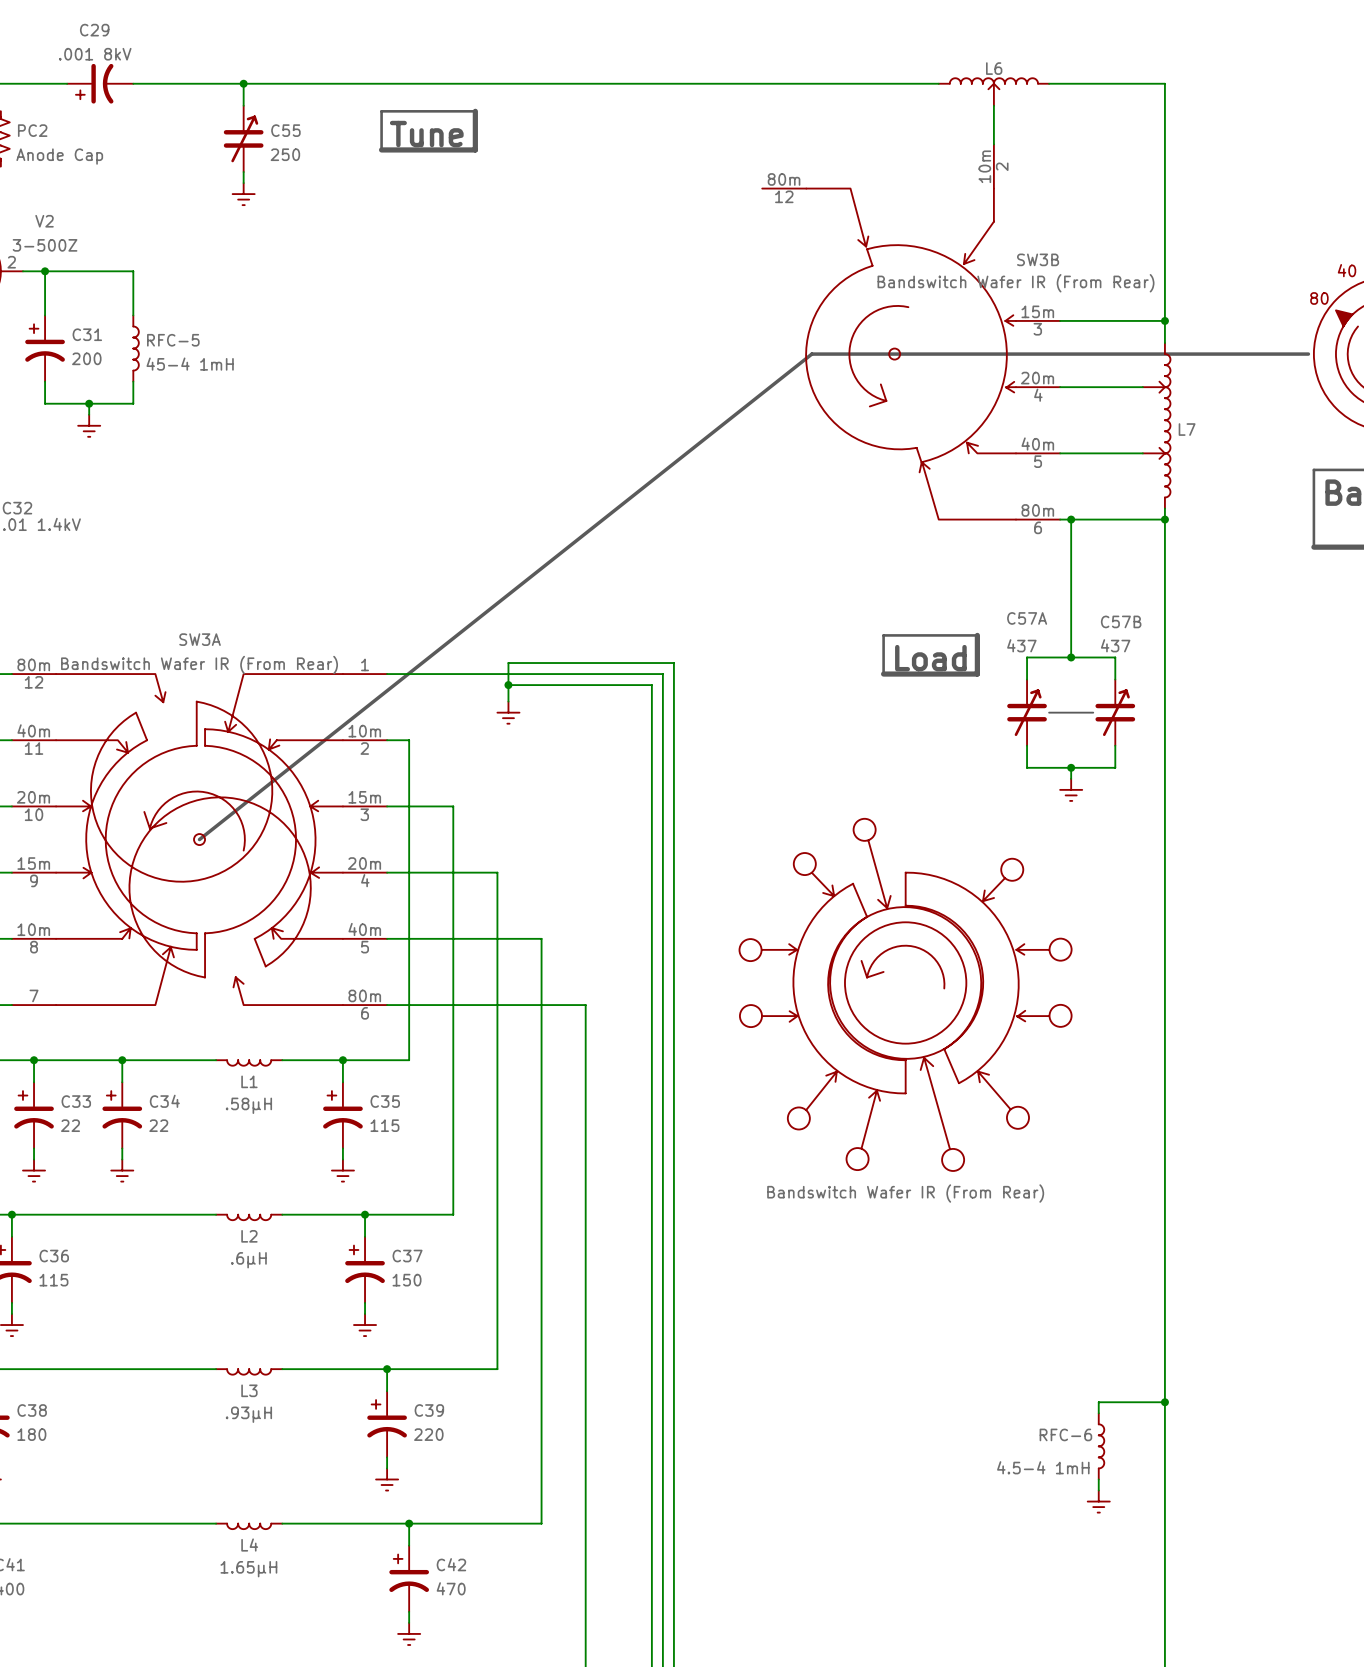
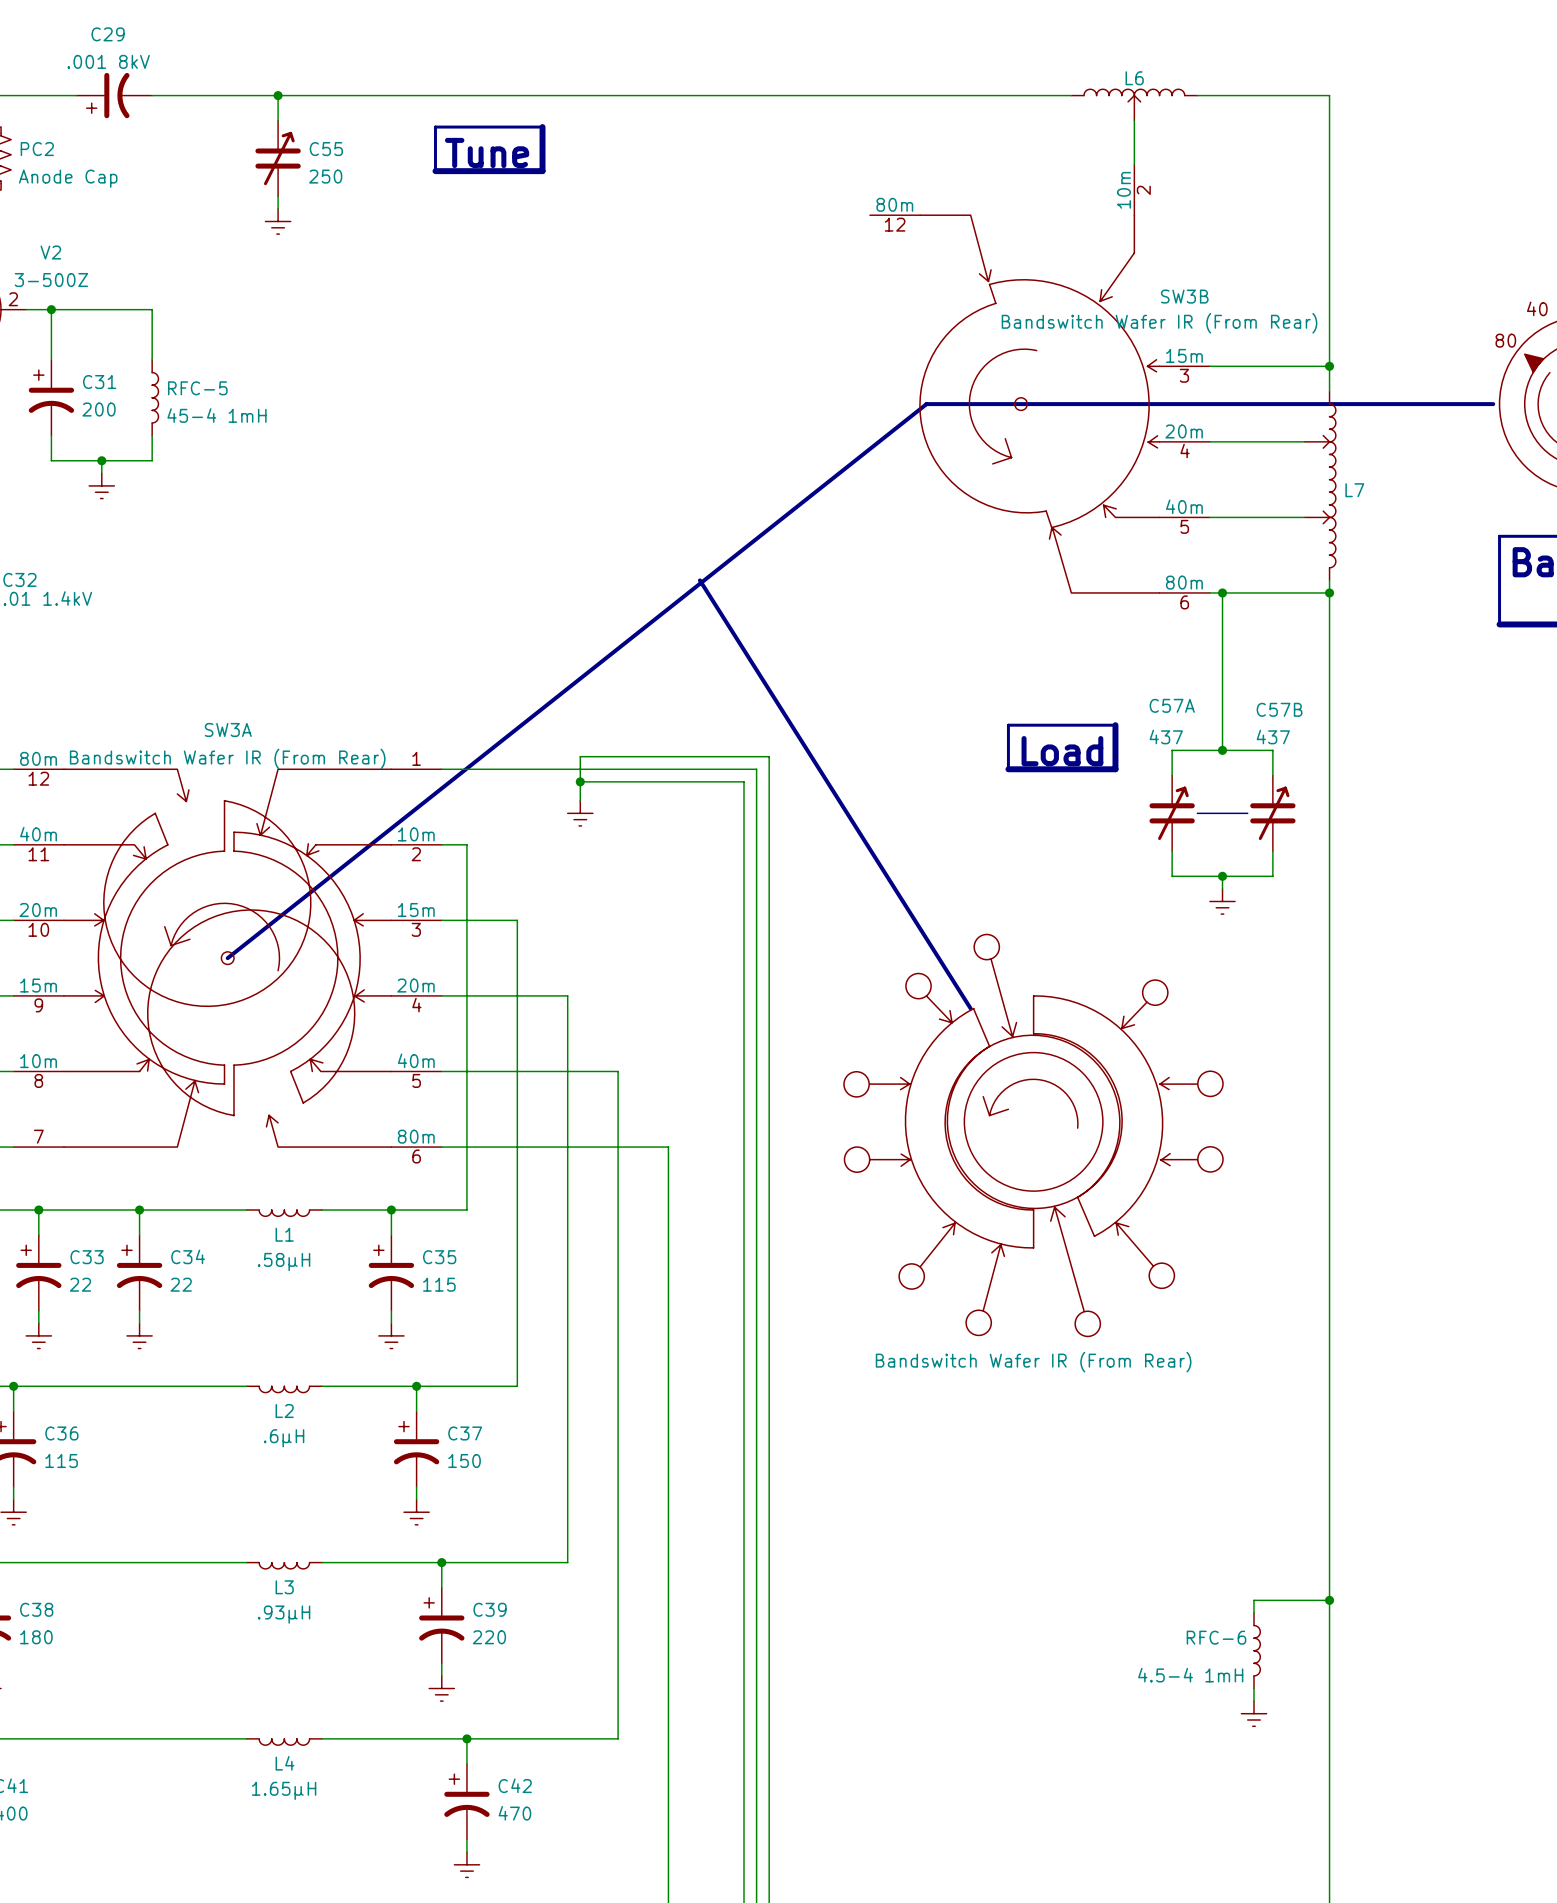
line: none -> (699, 580) (970, 1008)

